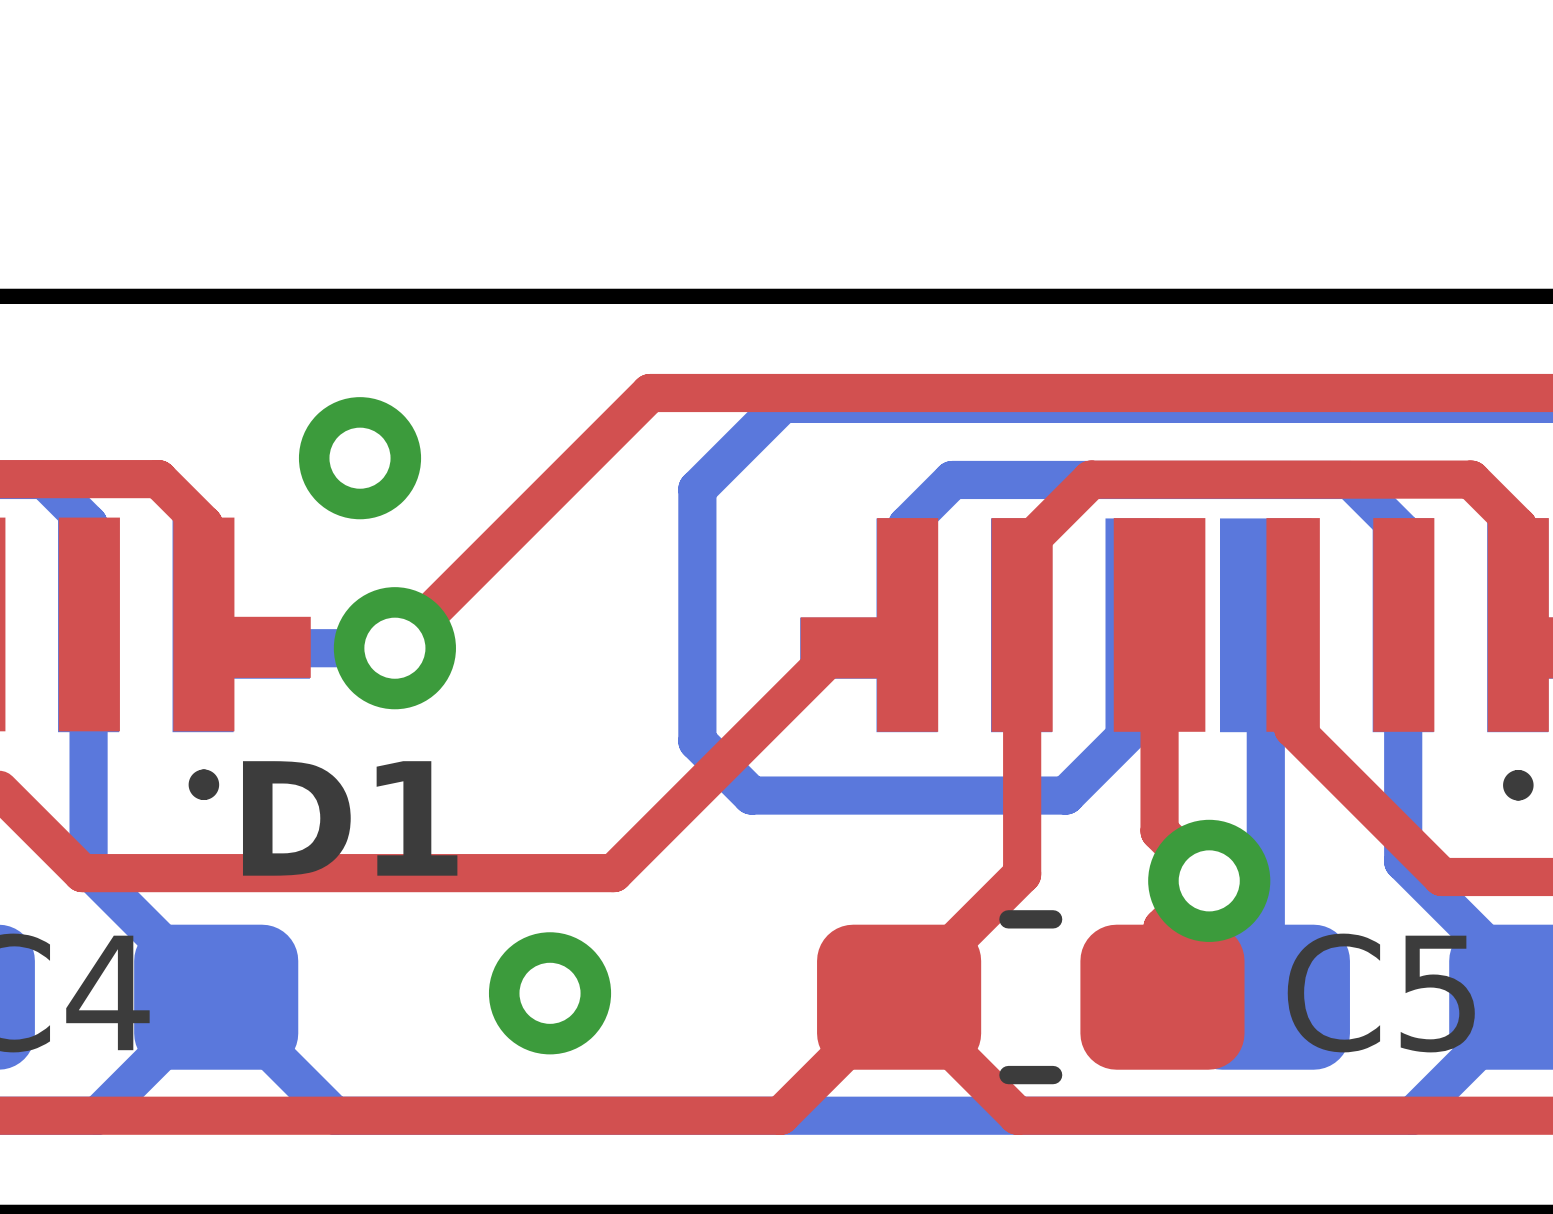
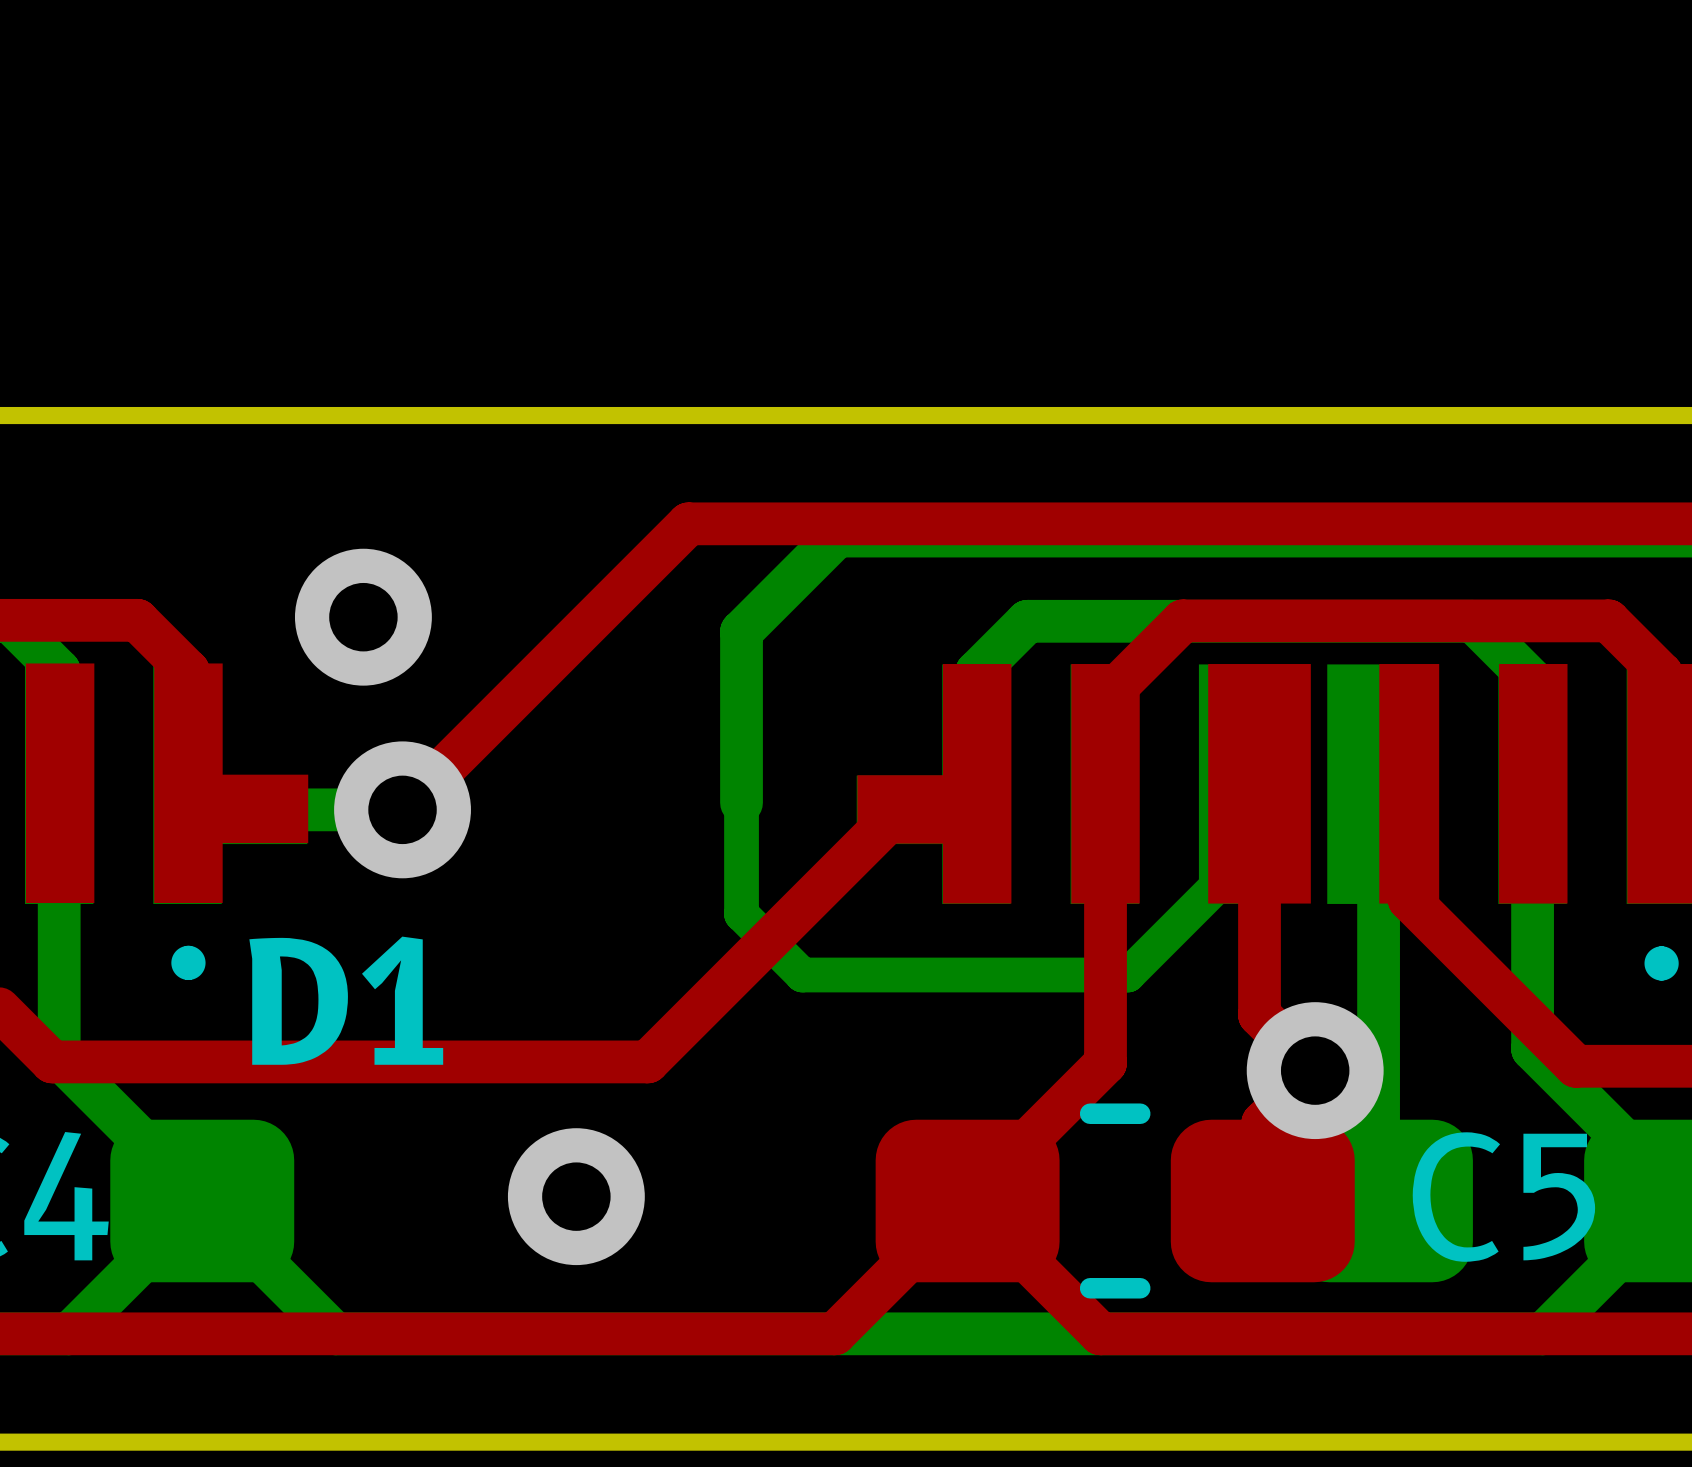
via position: (360, 458) -> (363, 617)
bottom track width: thick (697, 641) (697, 741) (751, 795) (1042, 795) -> thin (741, 802) (741, 914) (802, 975) (1127, 975)
bottom track: (1132, 705) (1132, 729) (1065, 795) (1042, 795) -> (1228, 874) (1127, 975)

